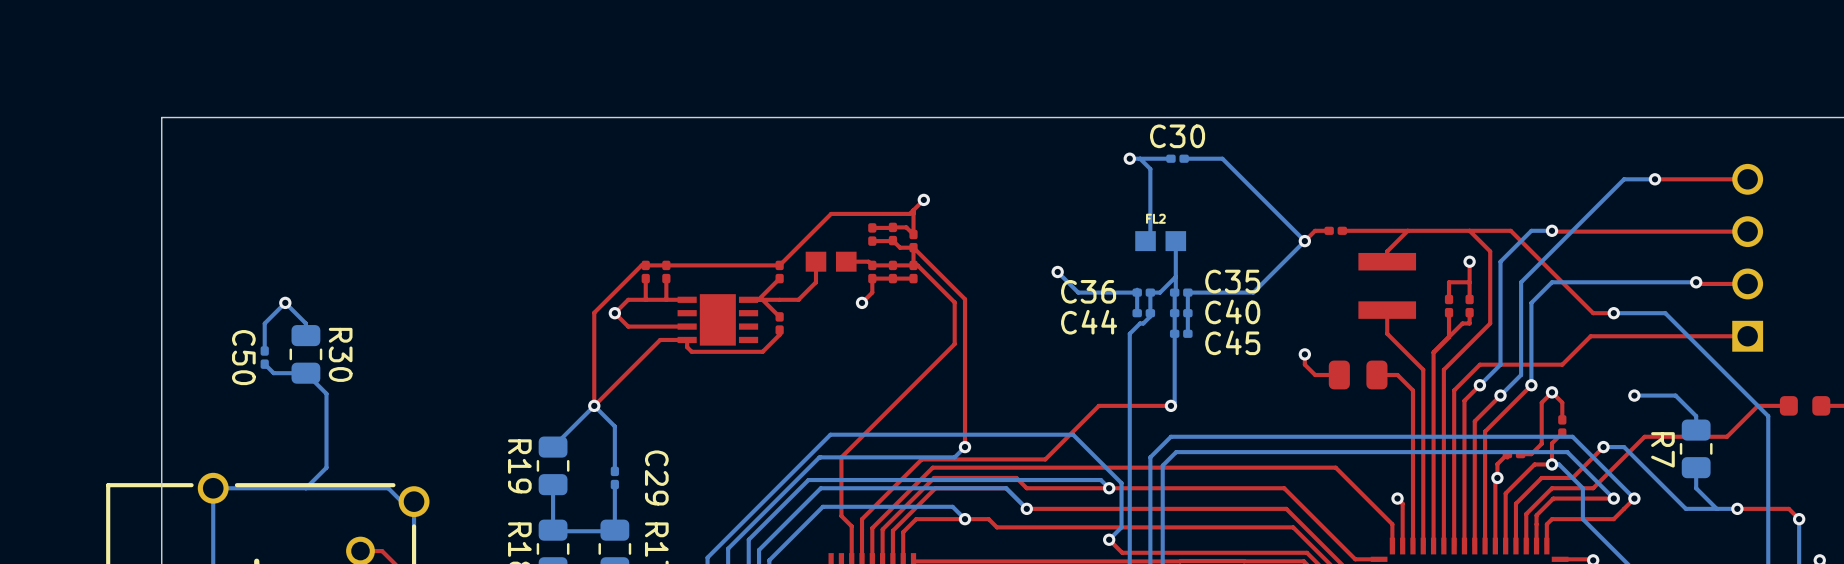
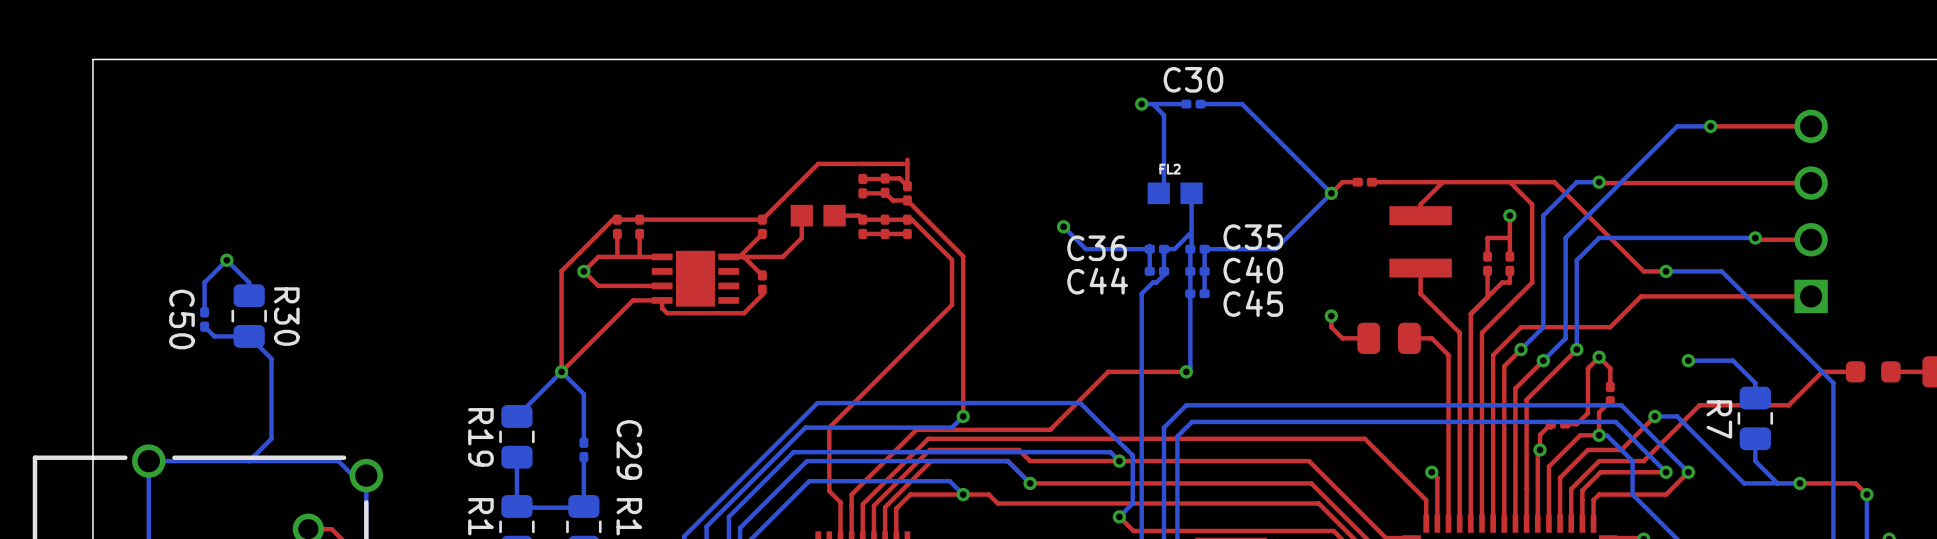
top track: (923, 199) (909, 213) -> none
via: (923, 199) -> none
top track: (913, 247) (913, 265) -> none
top track: (872, 278) (872, 292) (862, 302) -> none
via: (862, 302) -> none

